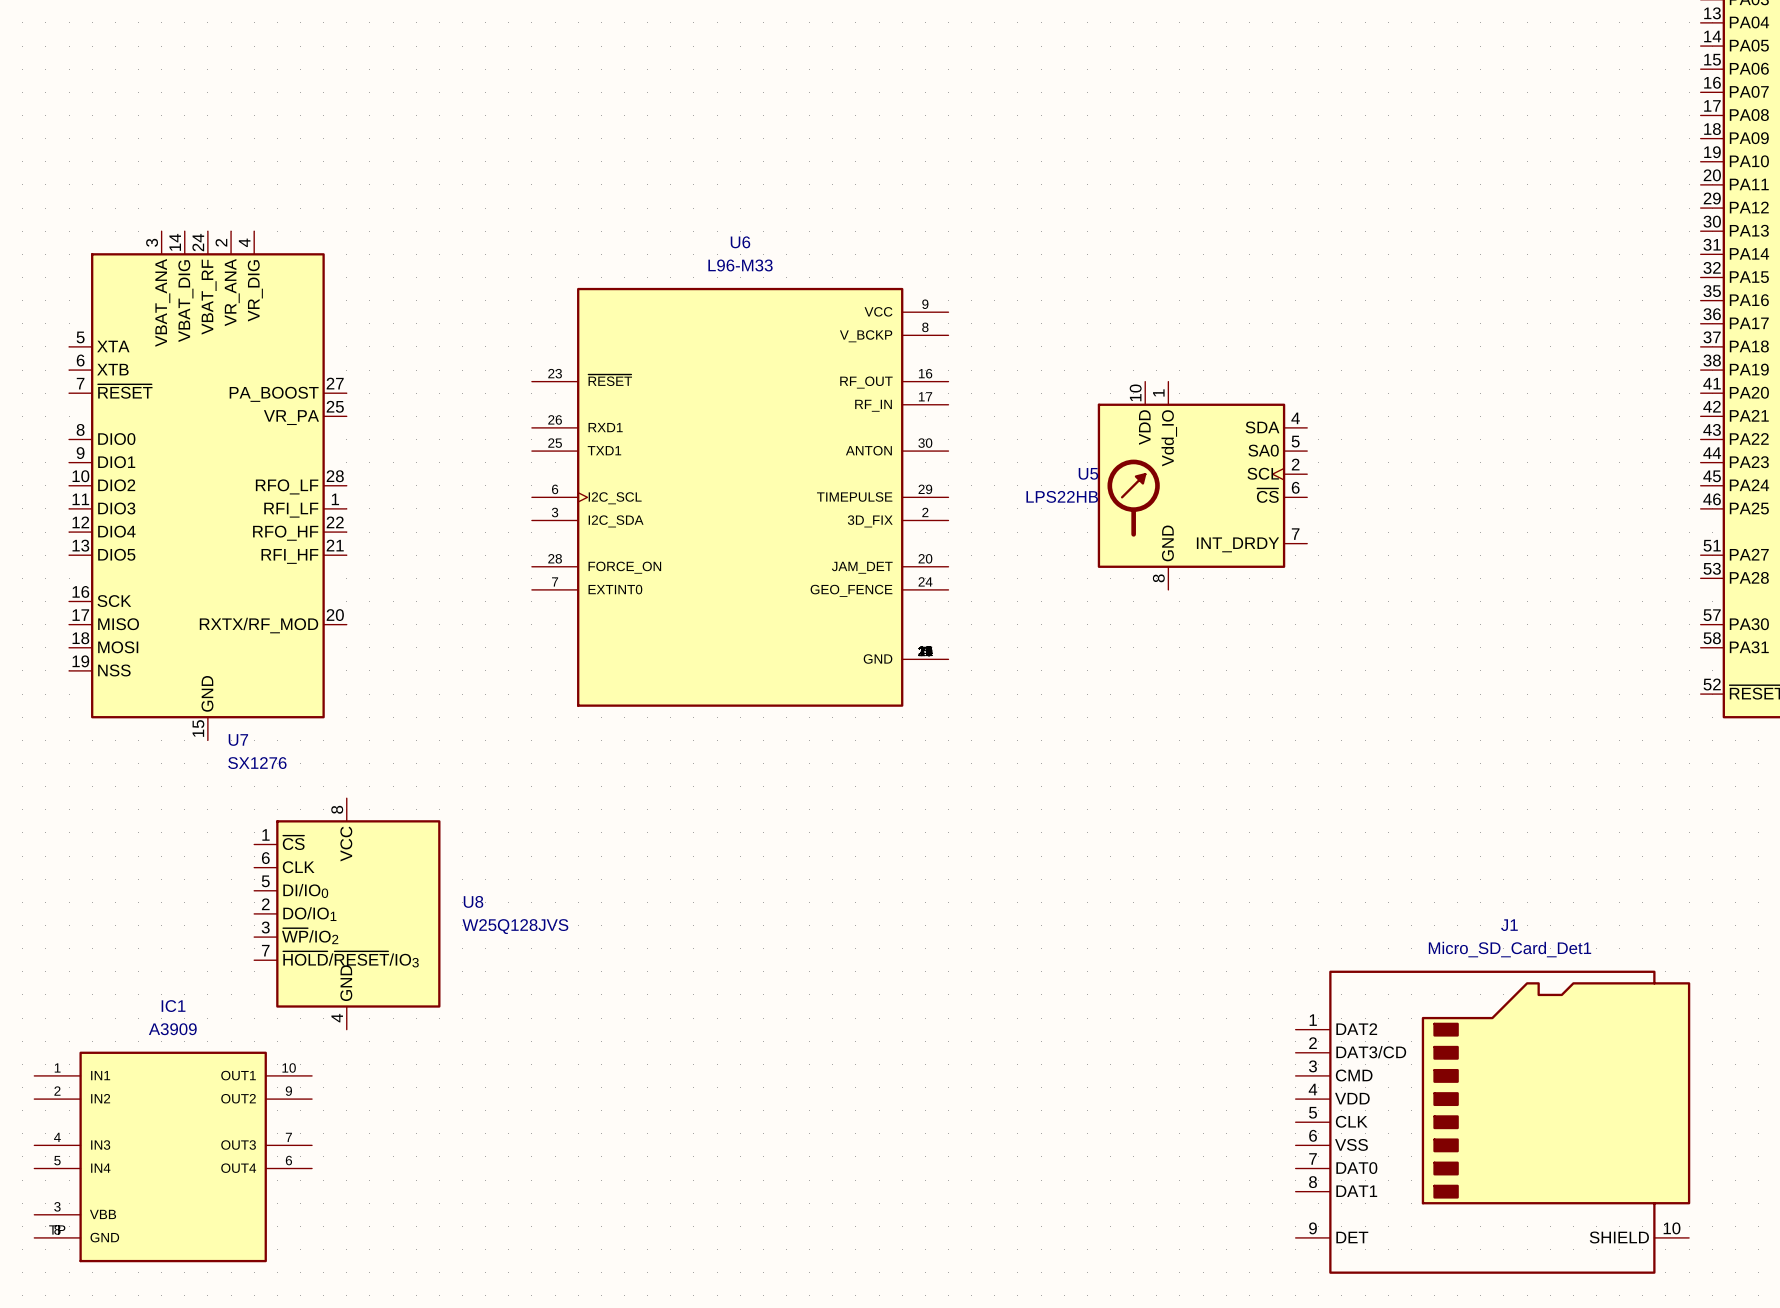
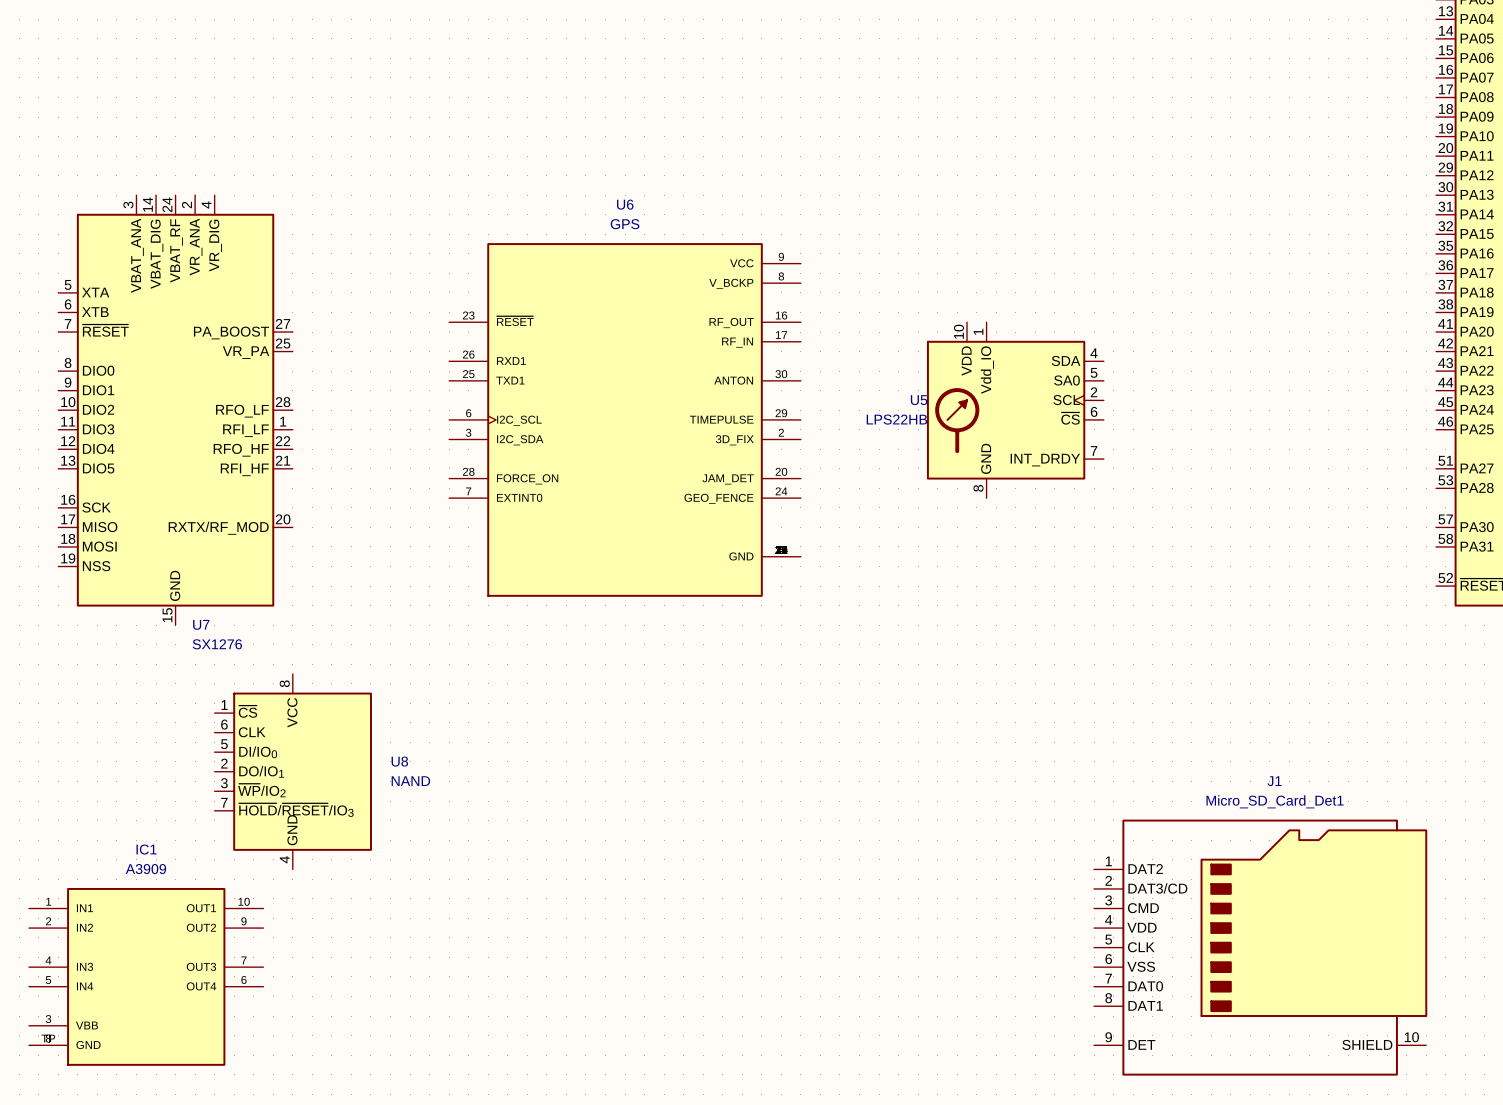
U6 value: L96-M33 (740, 265) -> GPS (625, 224)
U8 value: W25Q128JVS (515, 926) -> NAND (410, 781)

